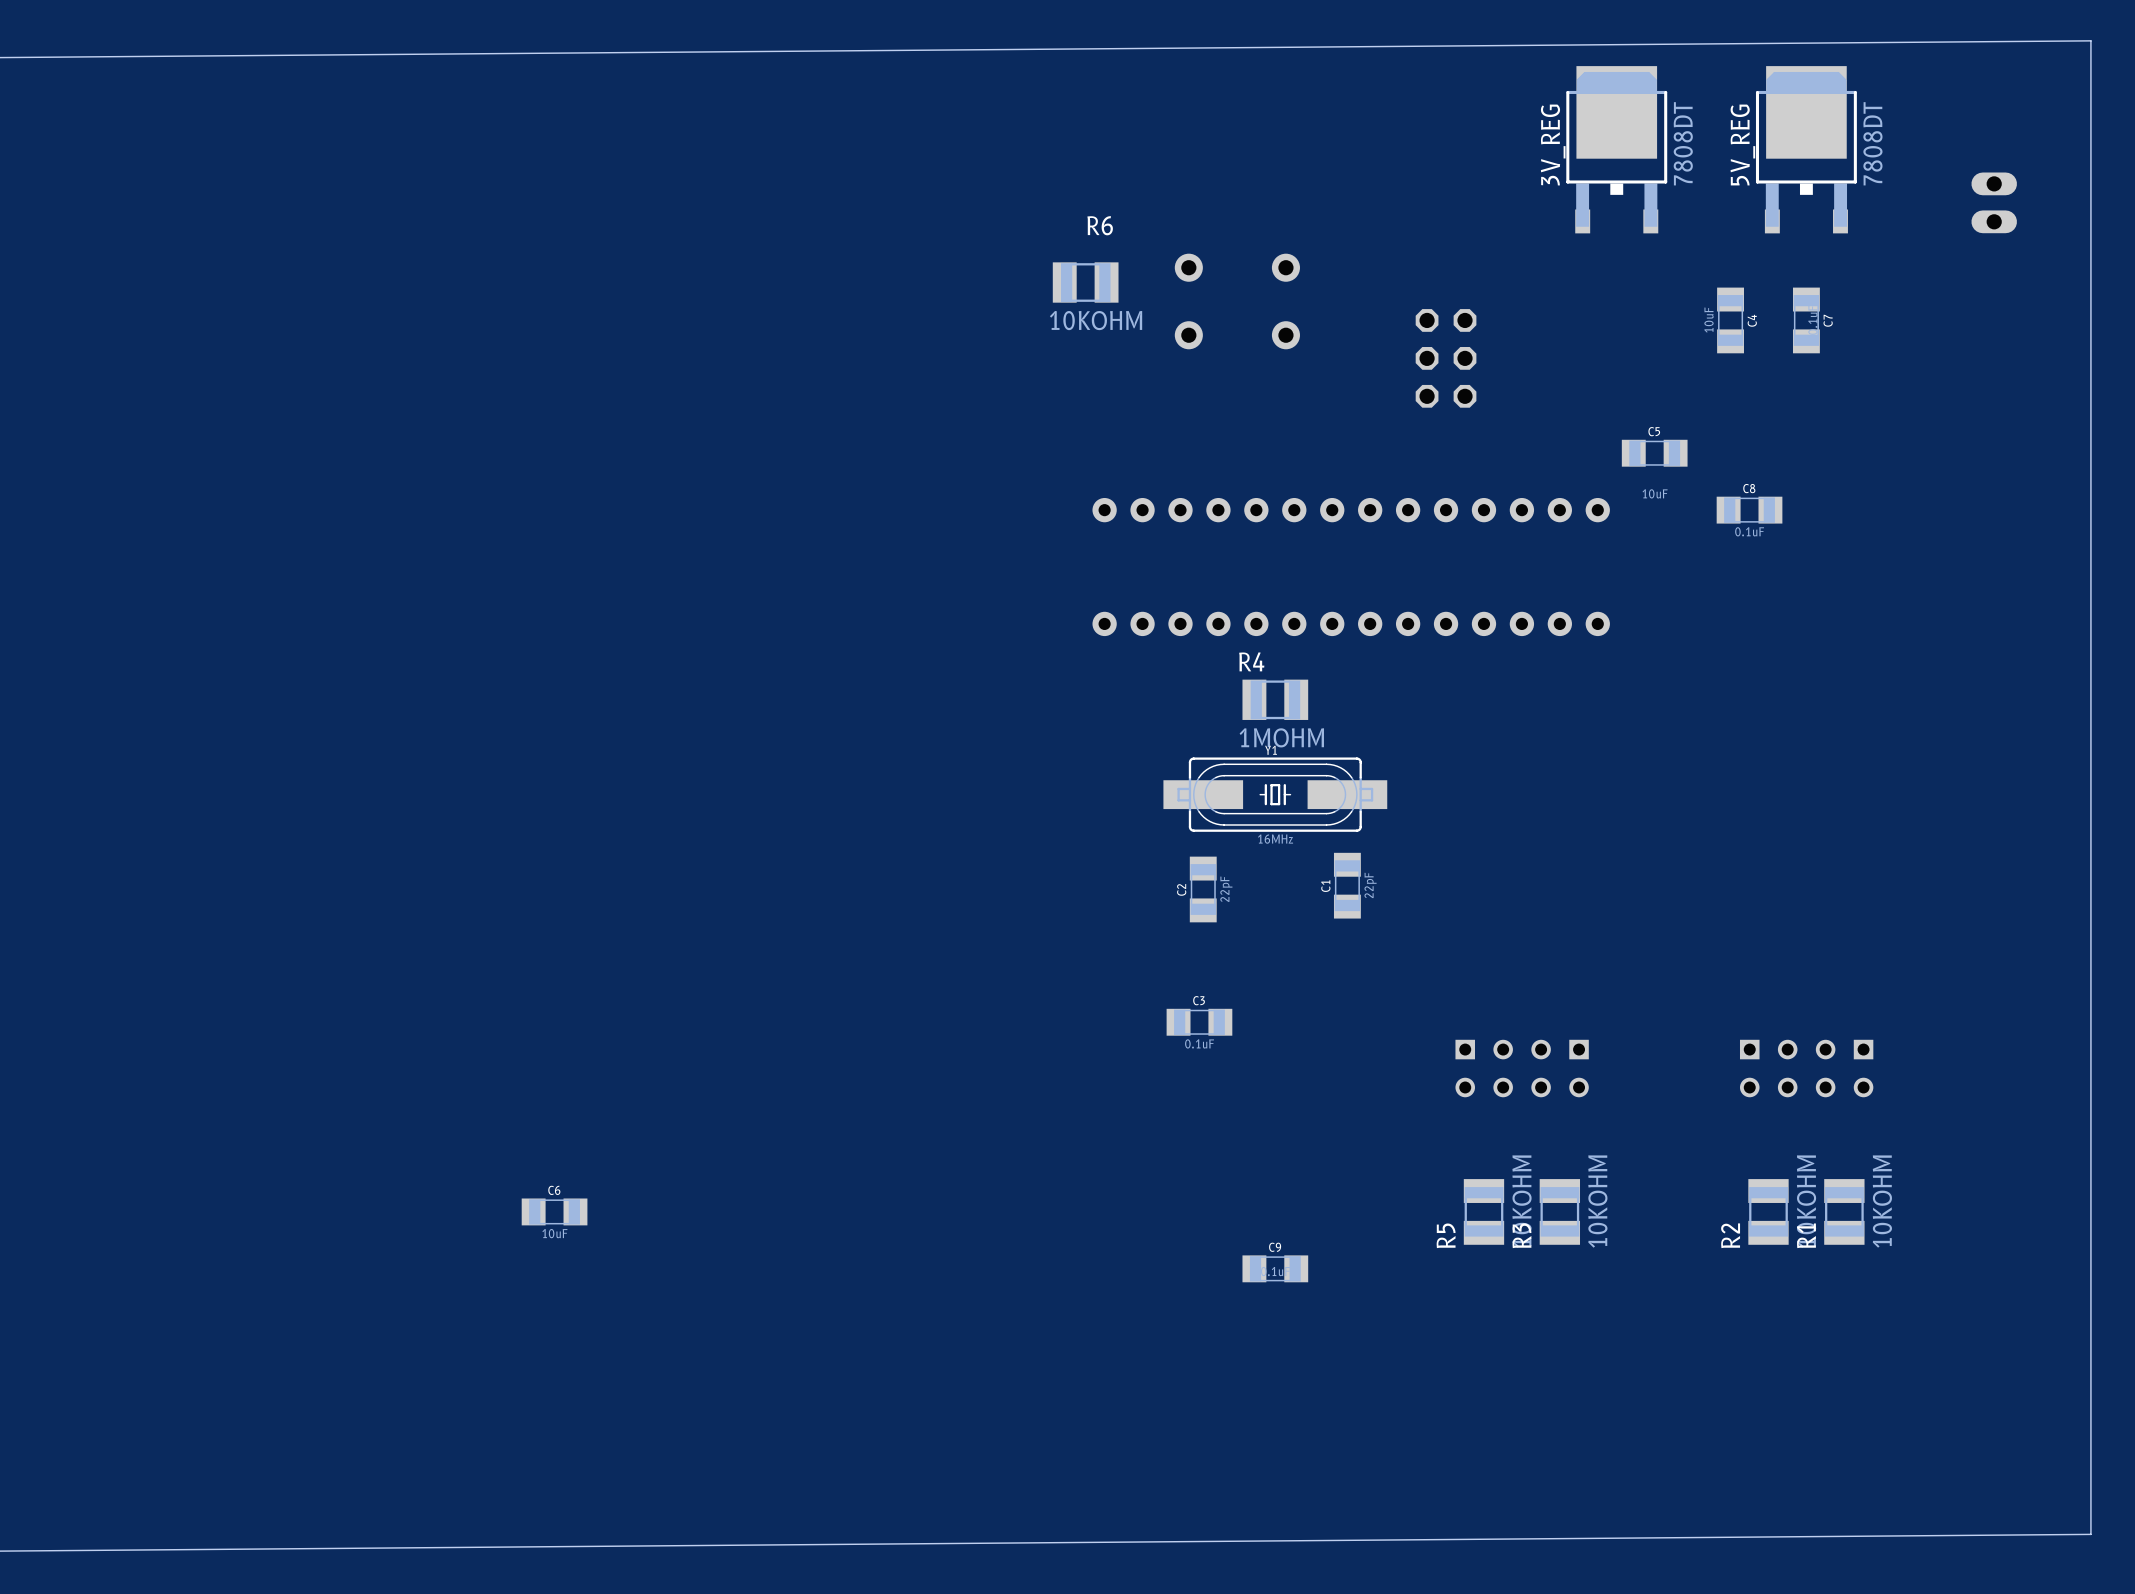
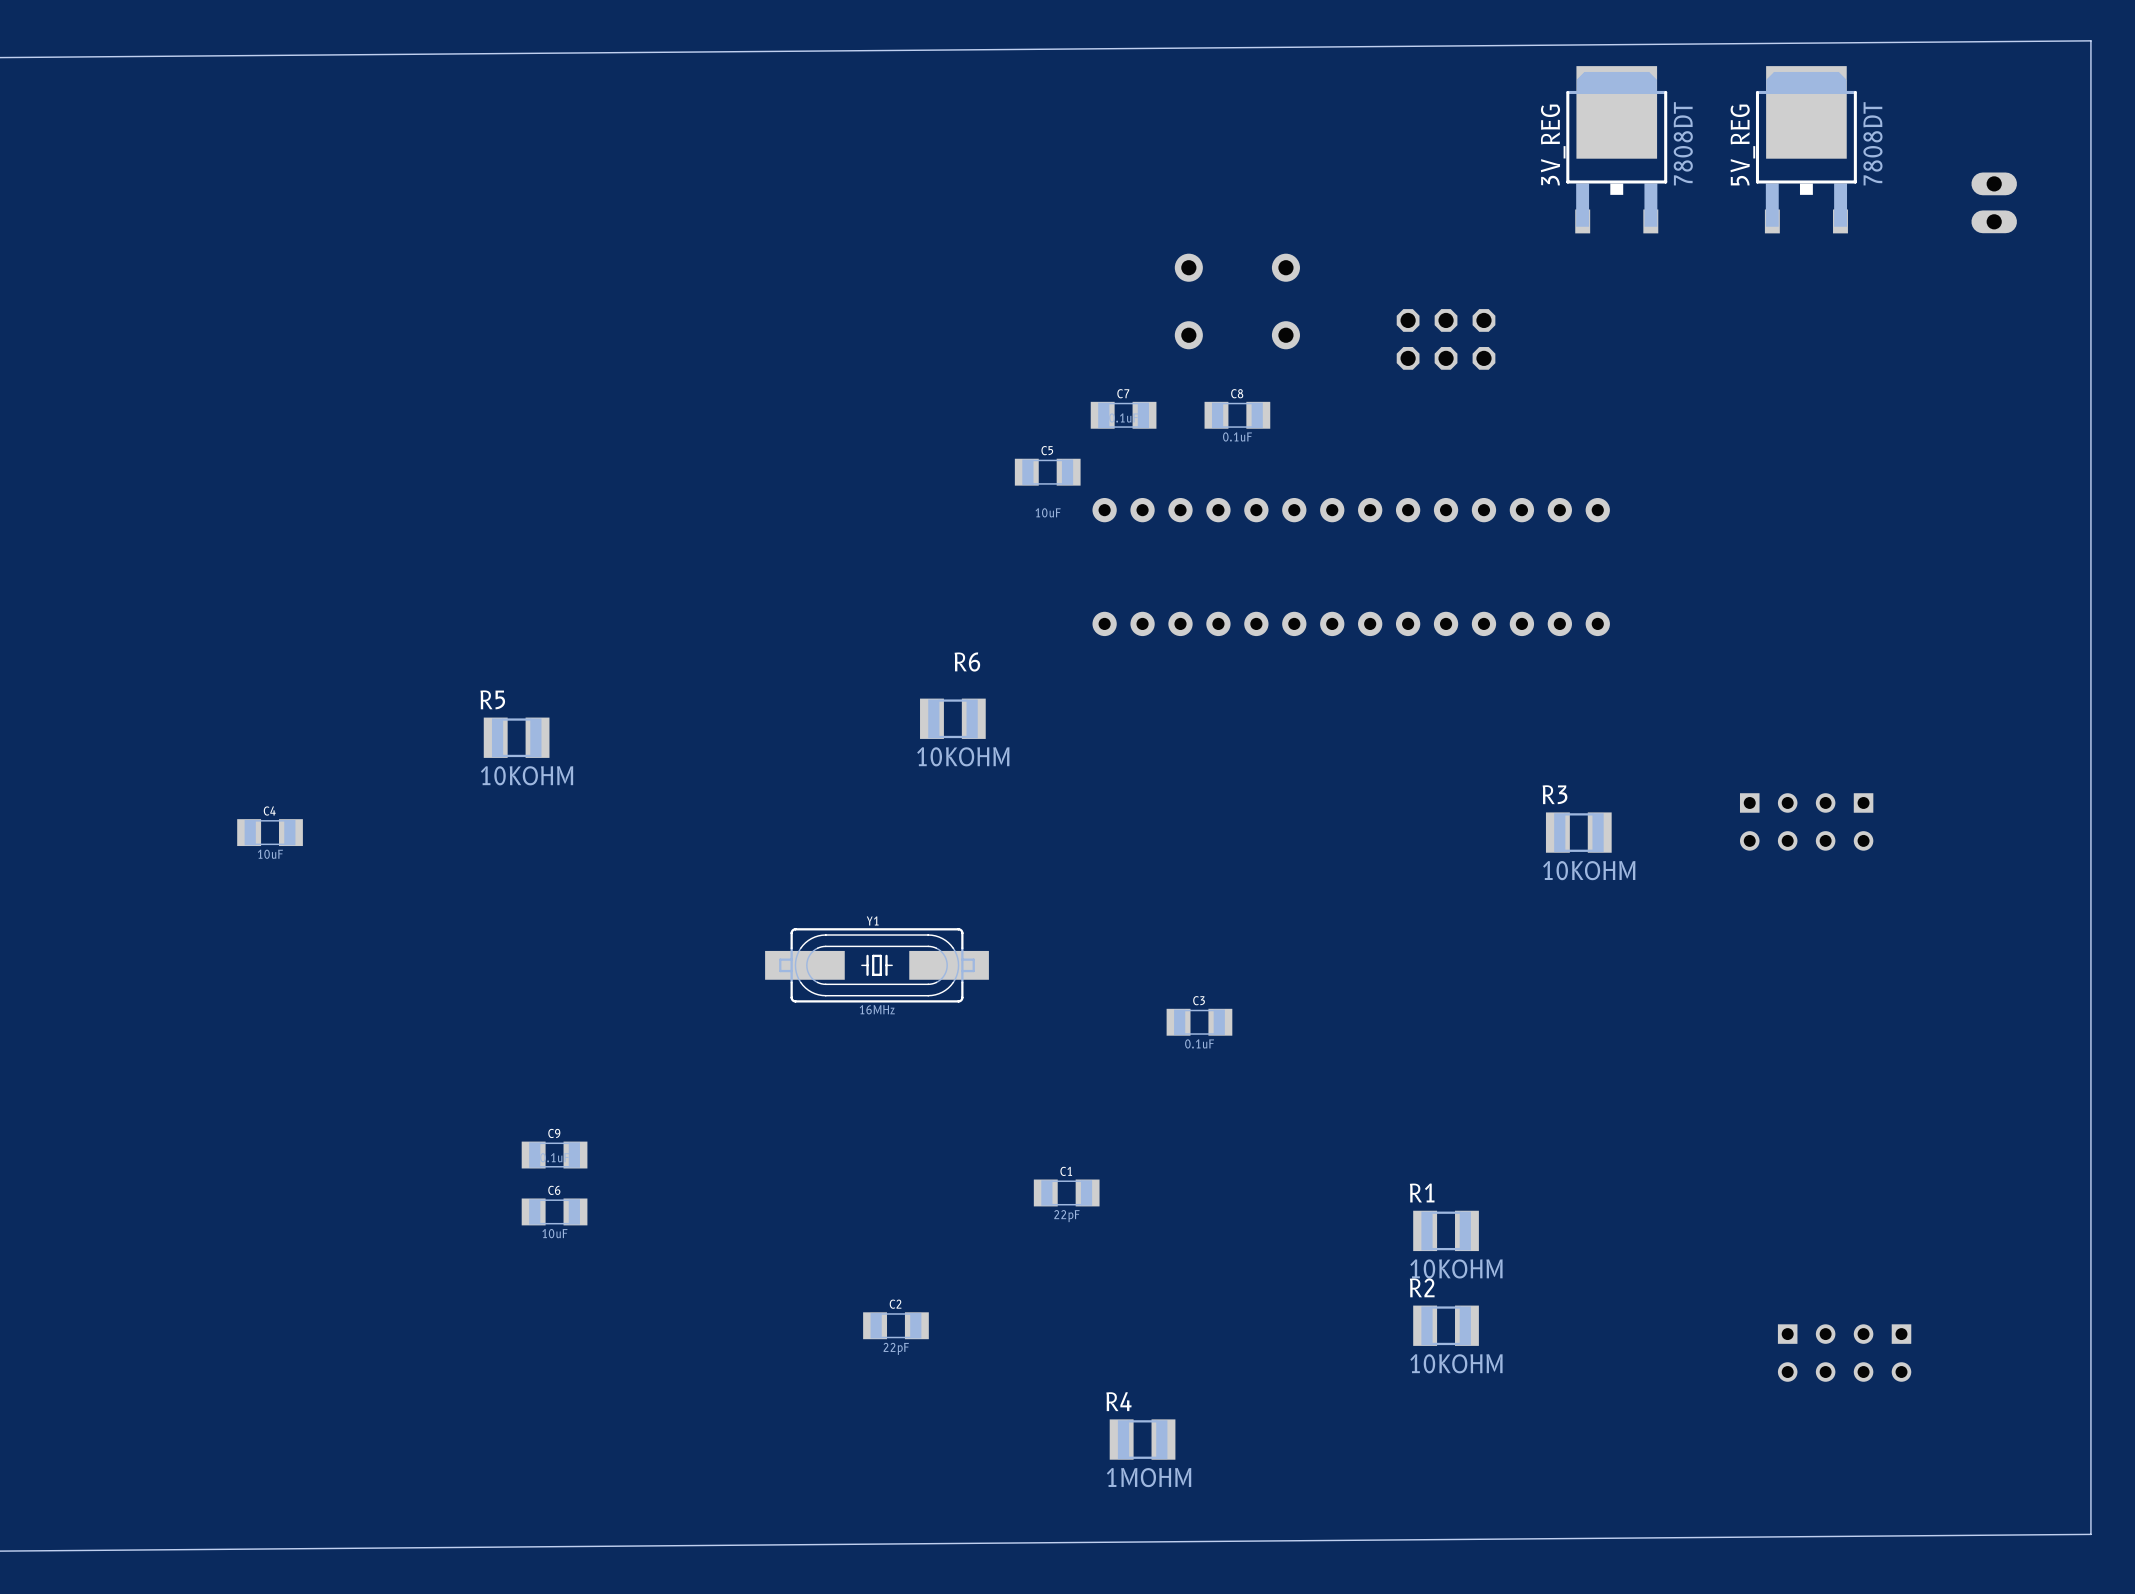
R6 position: (1085, 282) -> (952, 718)
C4 value position: 10uF (1708, 320) -> 10uF (270, 854)
C4 rotation: 0° (1730, 320) -> 90° clockwise (270, 832)
C4 position: (1730, 320) -> (270, 832)
C4 name position: C4 (1752, 320) -> C4 (269, 811)
C7 rotation: 0° (1806, 320) -> 90° clockwise (1123, 415)
C7 position: (1806, 320) -> (1123, 415)
C7 name position: C7 (1828, 320) -> C7 (1123, 393)
part rotation: 0° (1446, 358) -> 90° clockwise (1446, 339)
C5 position: (1654, 453) -> (1047, 472)
C8 position: (1749, 510) -> (1237, 415)
R4 position: (1275, 699) -> (1142, 1439)
Y1 position: (1275, 794) -> (877, 965)
part: none -> (1806, 821)
C1 rotation: 0° (1347, 885) -> 90° clockwise (1066, 1192)
C1 position: (1347, 885) -> (1066, 1192)
C2 rotation: 0° (1203, 889) -> 90° clockwise (895, 1325)
C2 position: (1203, 889) -> (895, 1325)
part: (1522, 1068) -> none
part: (1806, 1068) -> none
R5 rotation: 0° (1483, 1211) -> 90° clockwise (516, 737)
R5 position: (1483, 1211) -> (516, 737)
R3 rotation: 0° (1559, 1211) -> 90° clockwise (1578, 832)
R3 position: (1559, 1211) -> (1578, 832)
R2 rotation: 0° (1768, 1211) -> 90° clockwise (1446, 1325)
R2 position: (1768, 1211) -> (1446, 1325)
R1 rotation: 0° (1844, 1211) -> 90° clockwise (1446, 1230)
R1 position: (1844, 1211) -> (1446, 1230)
C9 position: (1275, 1268) -> (554, 1155)
part: none -> (1844, 1353)

